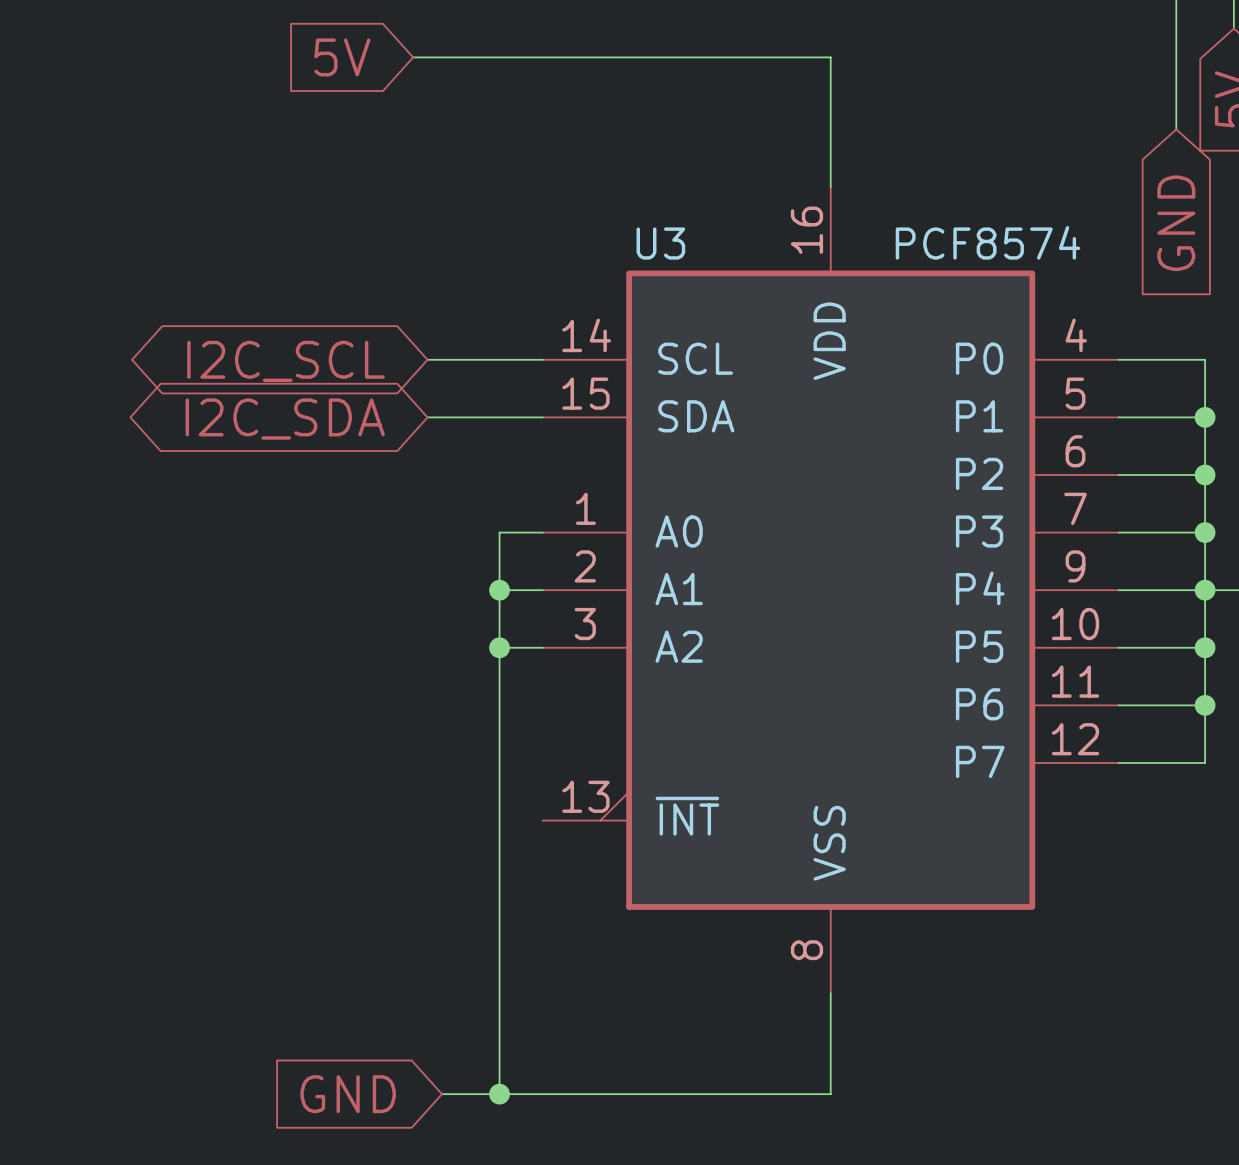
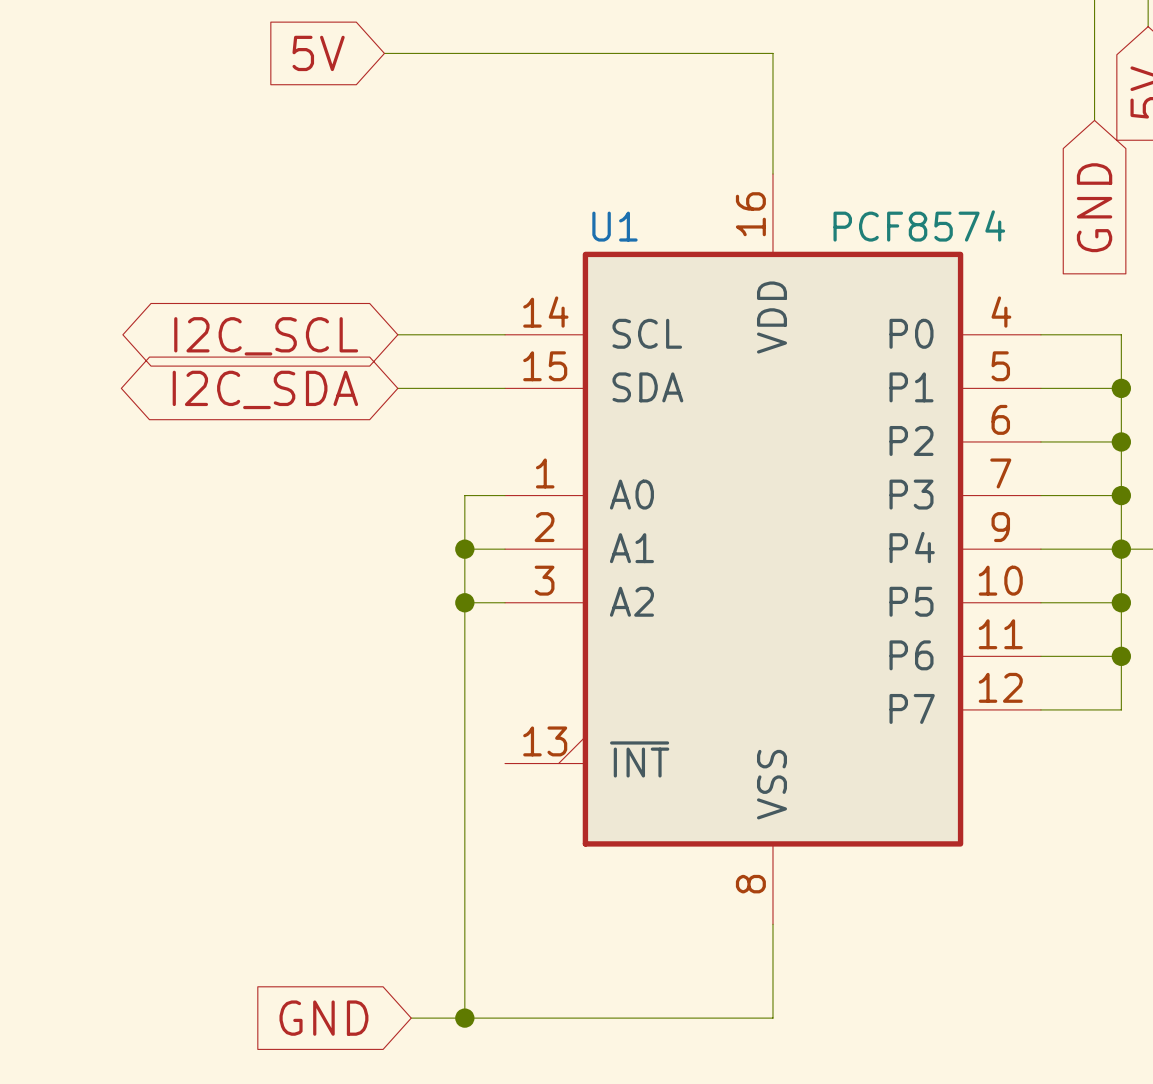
U3 name: U3 (660, 243) -> U1 (614, 226)

